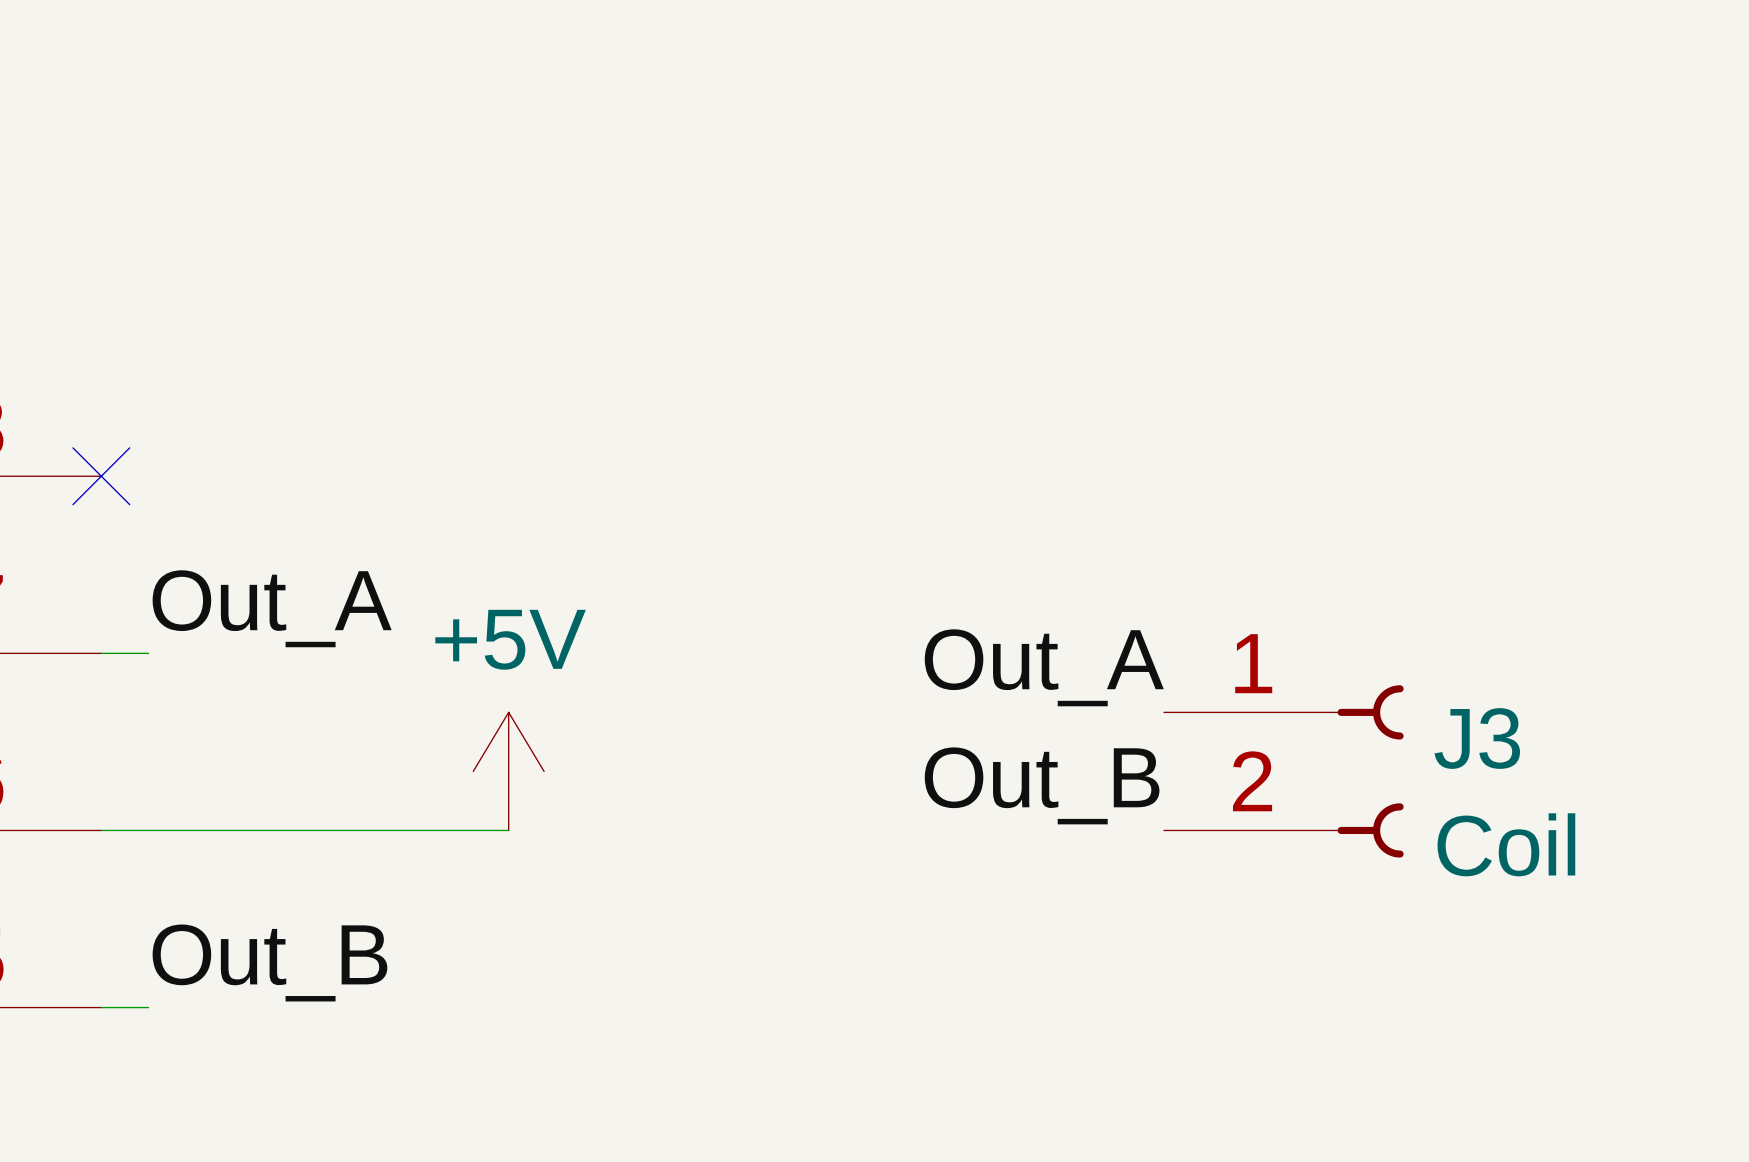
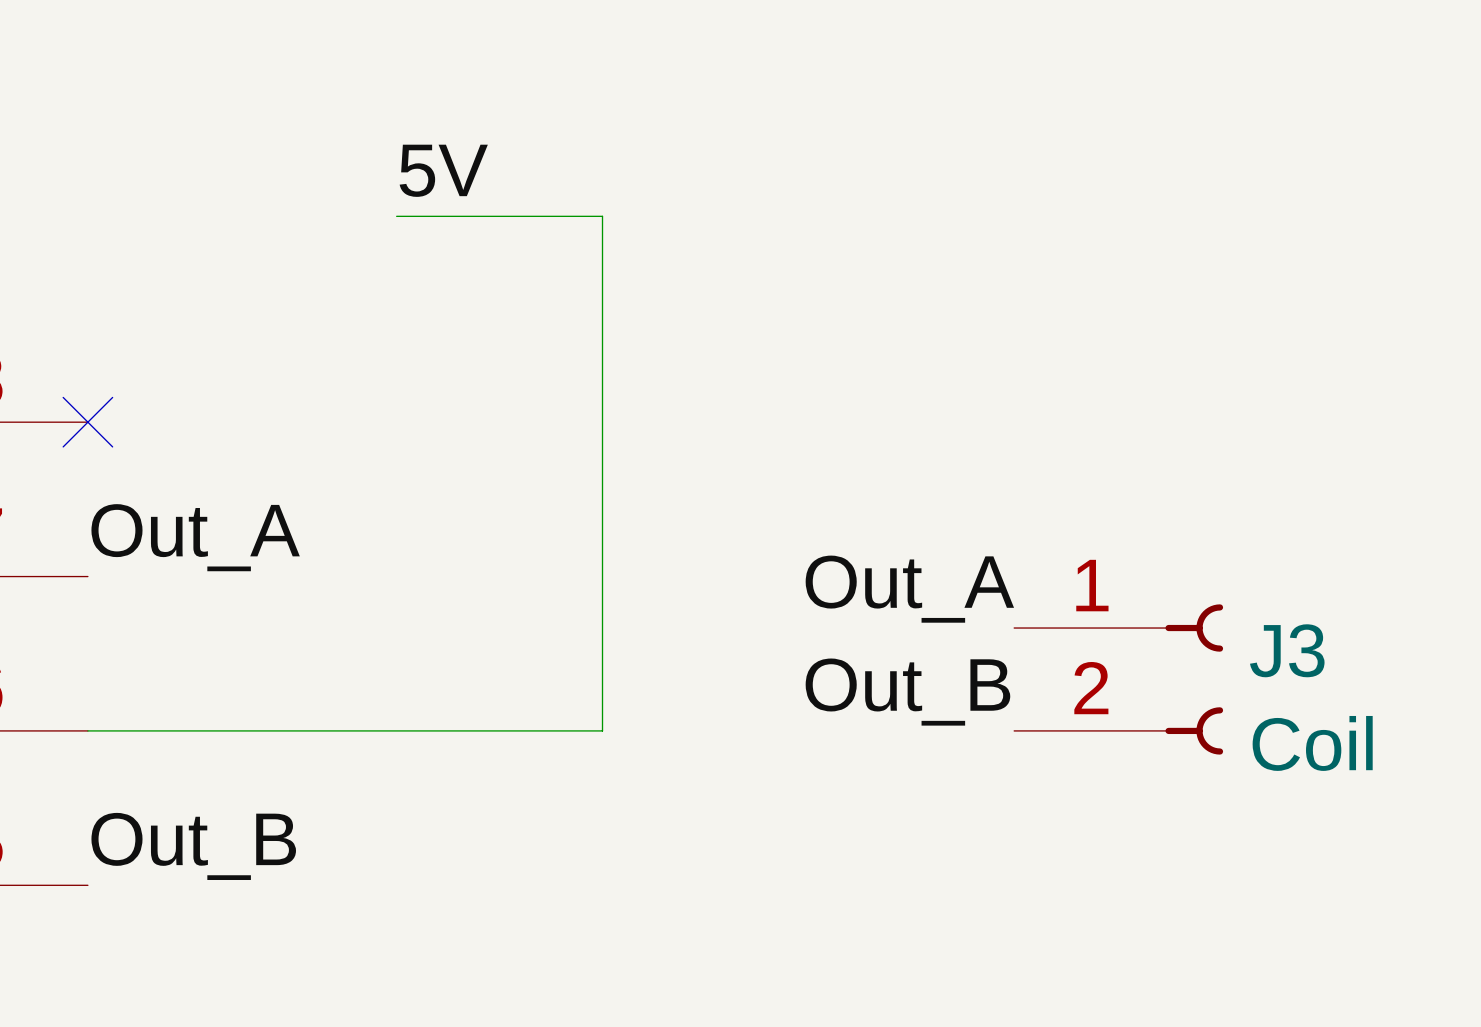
label: none -> 5V (443, 170)
wire: none -> (396, 216) (602, 216) (602, 730) (442, 730)
label position: Out_A (272, 608) -> Out_A (195, 537)
wire: (101, 653) (148, 653) -> none
power symbol: +5V (508, 771) -> none
label position: Out_B (269, 962) -> Out_B (193, 846)
wire: (101, 1007) (148, 1007) -> none

